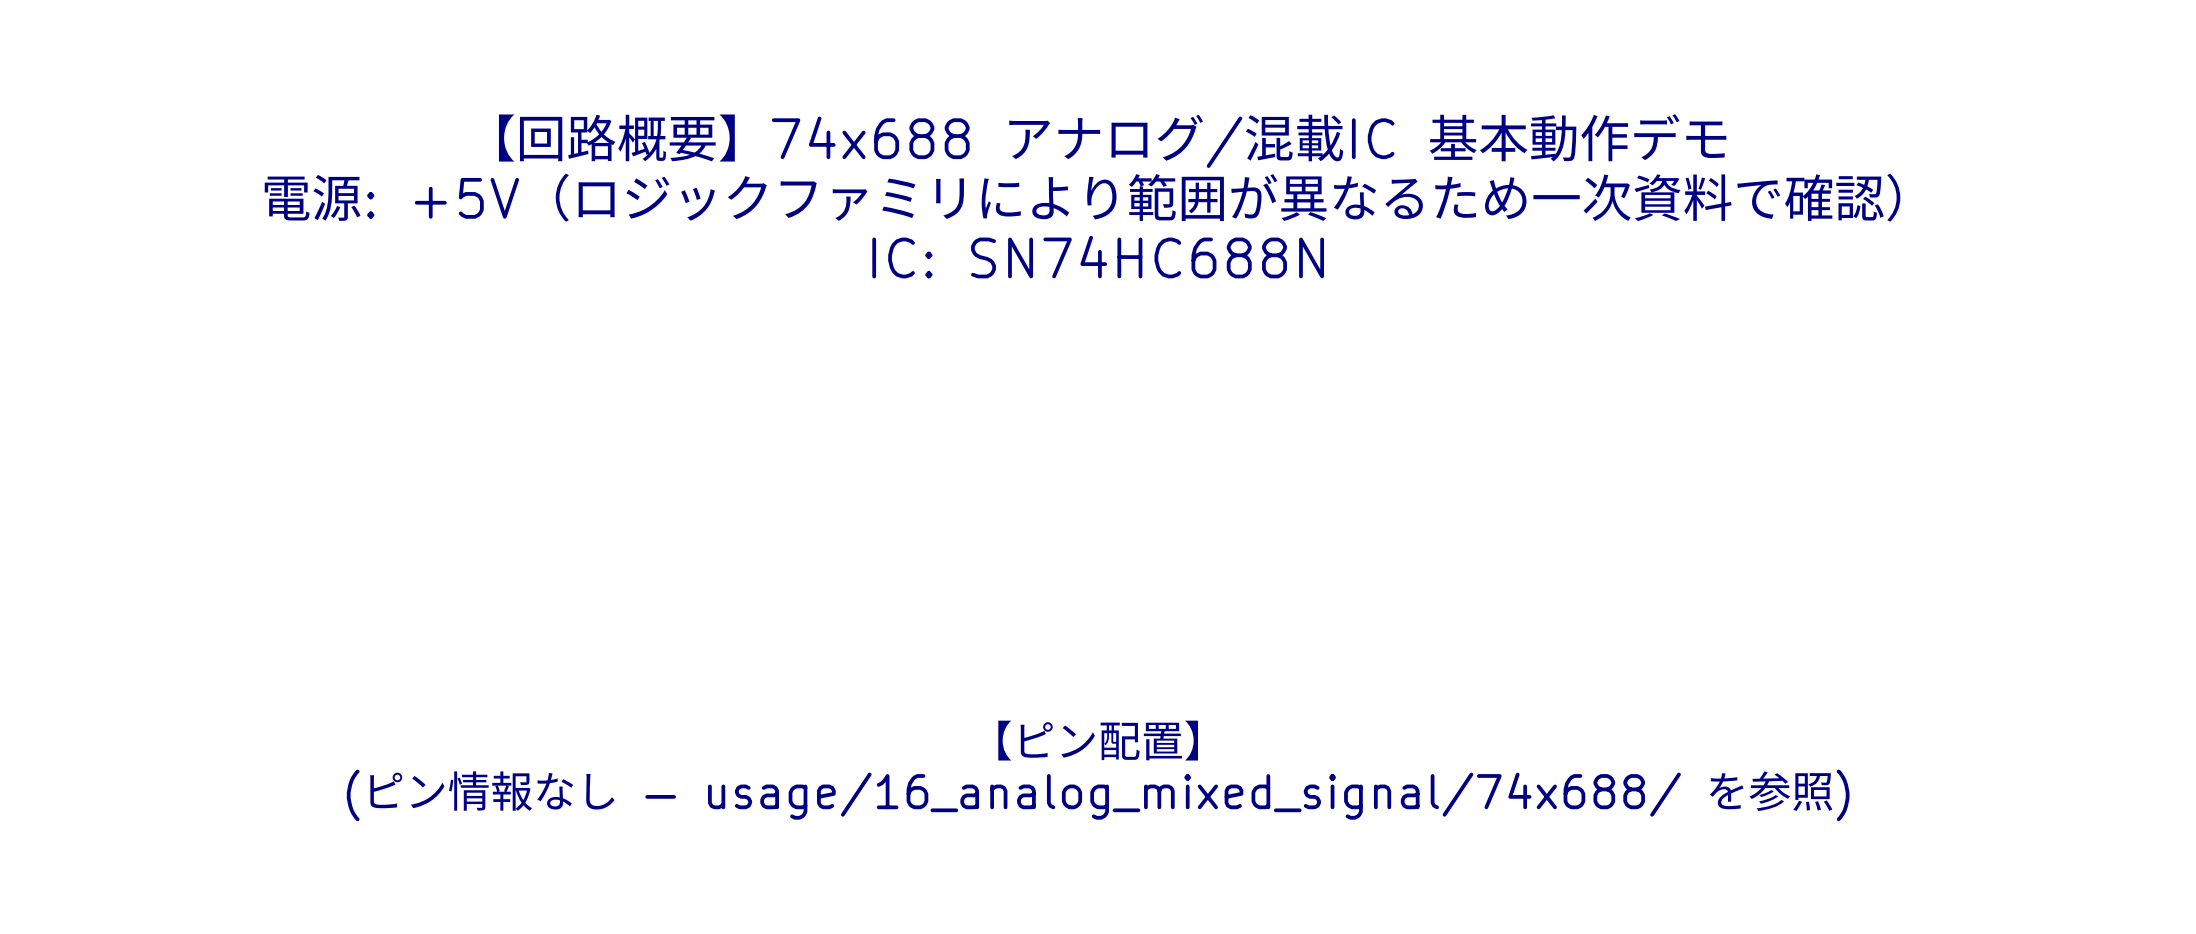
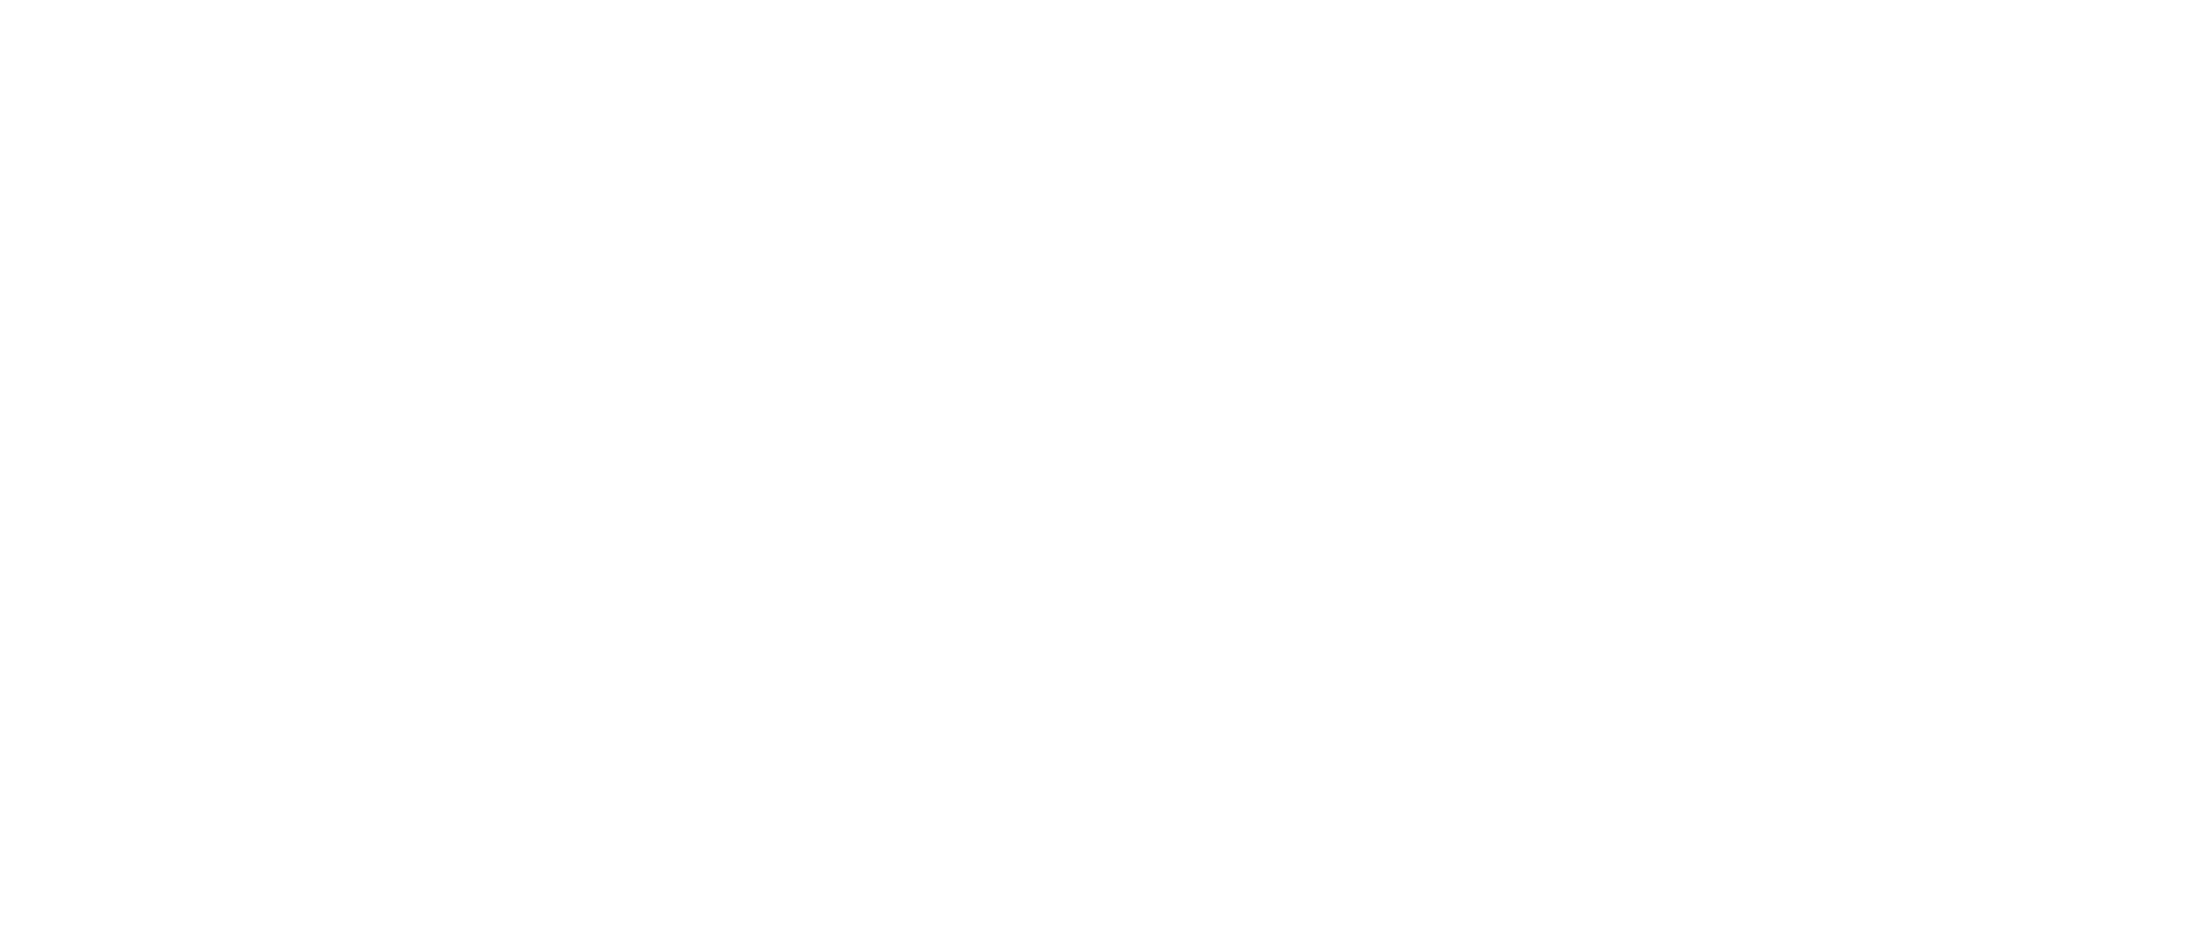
text: 【回路概要】74x688 アナログ/混載IC 基本動作デモ (1112, 140) -> none
text: 電源: +5V（ロジックファミリにより範囲が異なるため一次資料で確認） (1082, 197) -> none
text: IC: SN74HC688N (1098, 257) -> none
text: 【ピン配置】 (1098, 740) -> none
text: (ピン情報なし — usage/16_analog_mixed_signal/74x688/ を参照) (1098, 795) -> none

